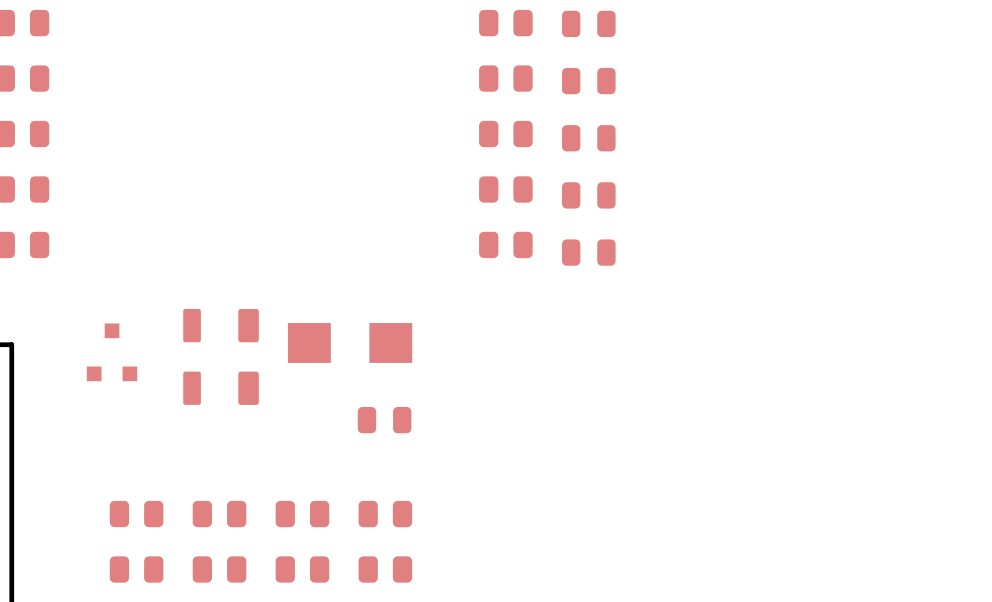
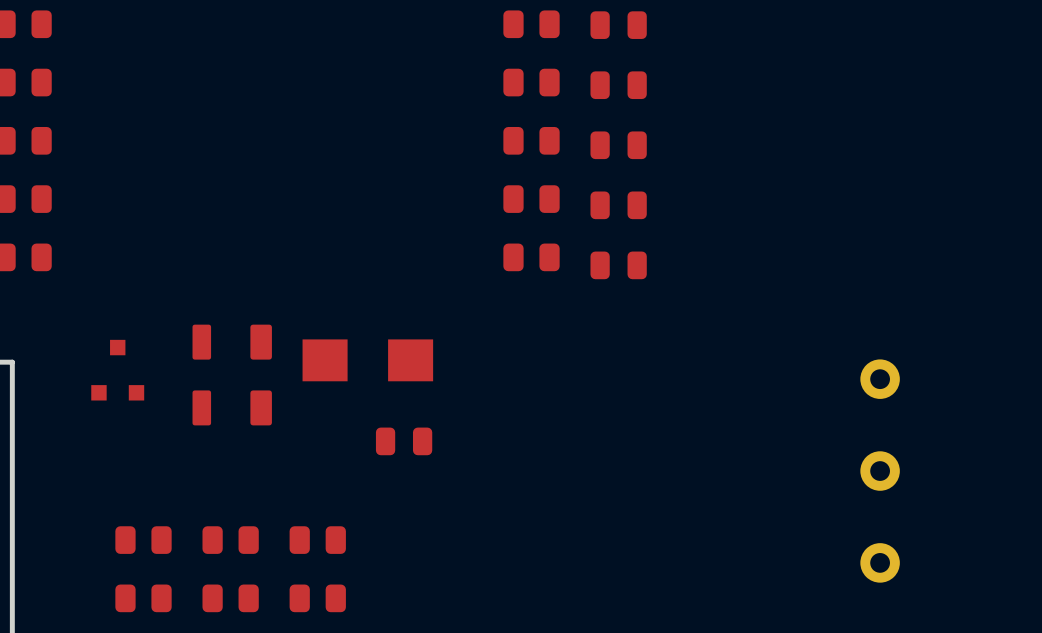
part: none -> (880, 379)
part: none -> (880, 471)
part: (385, 514) -> none
part: none -> (880, 562)
part: (385, 569) -> none

